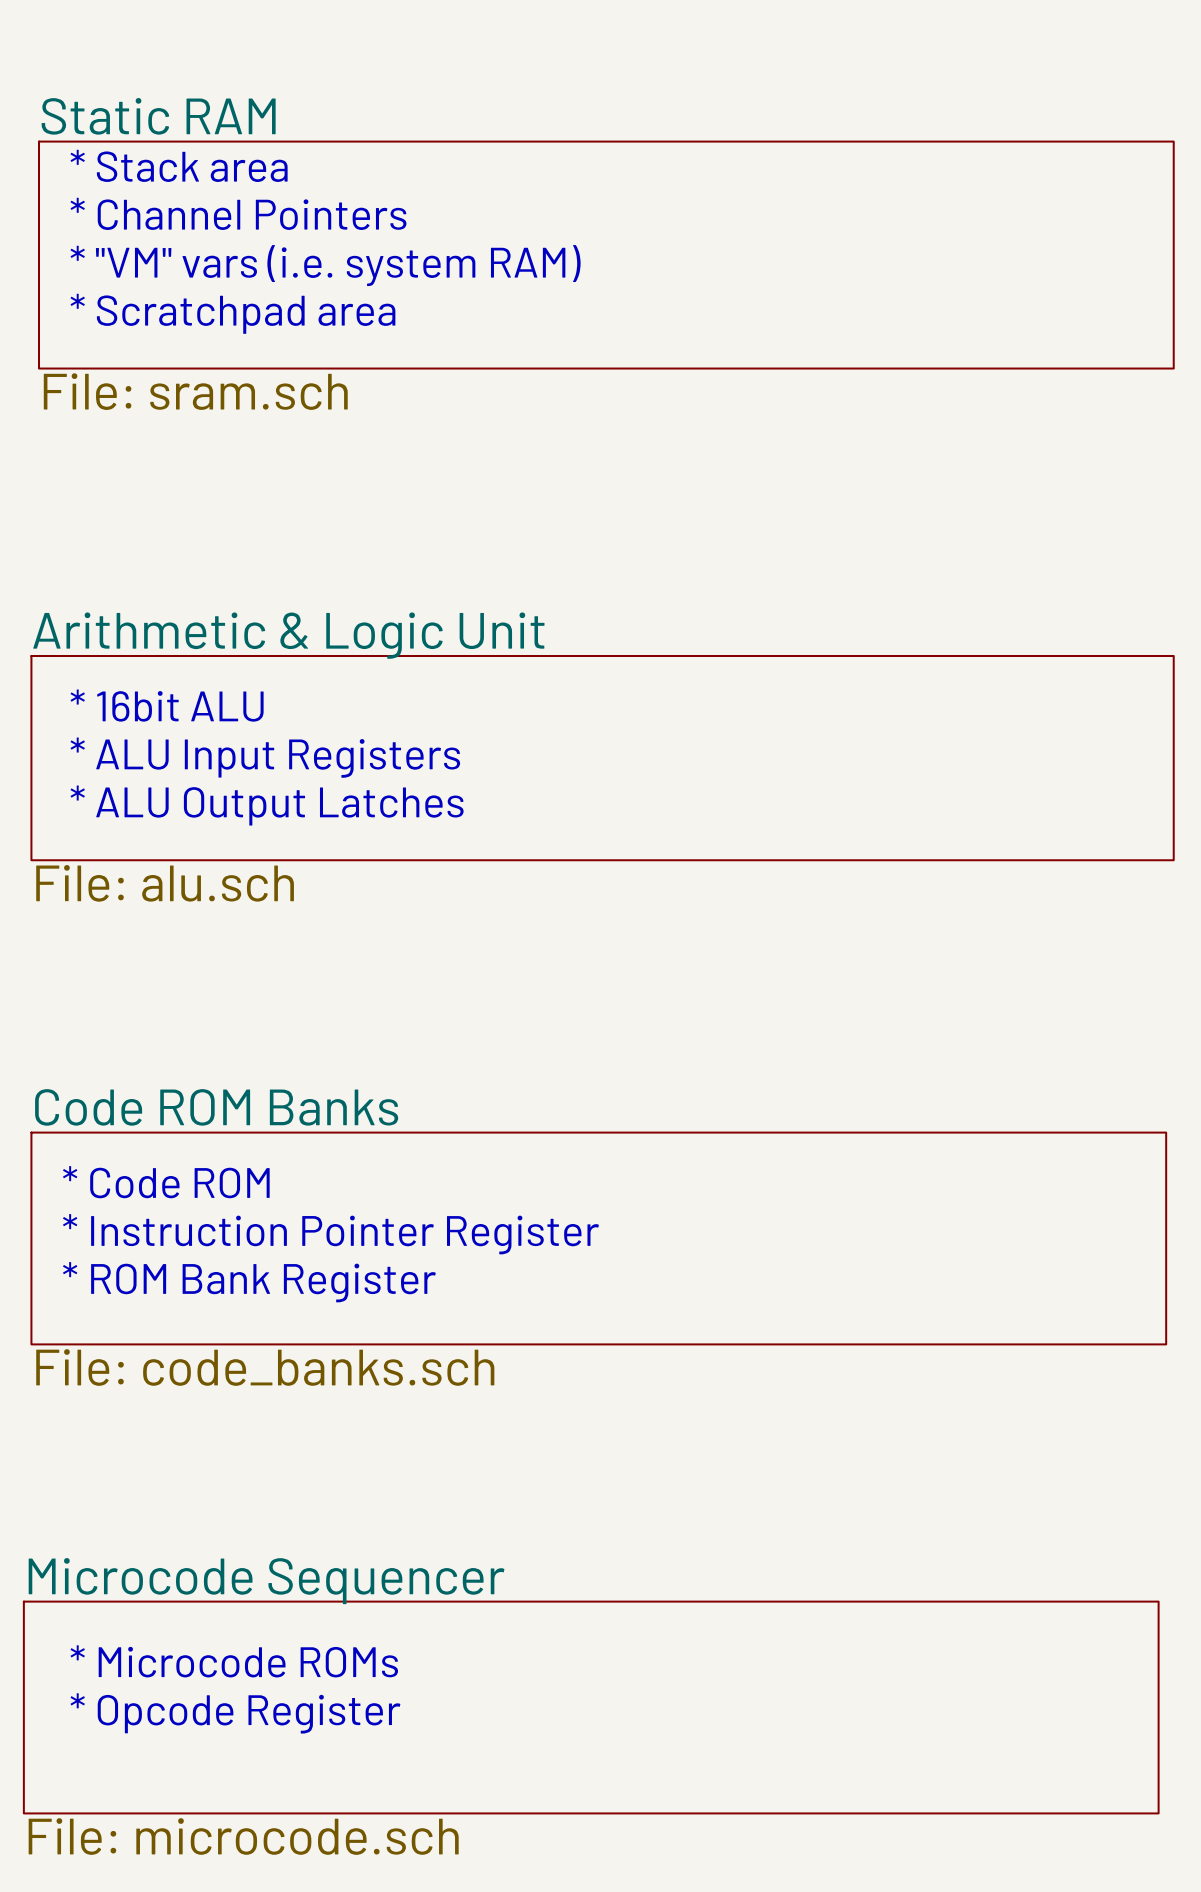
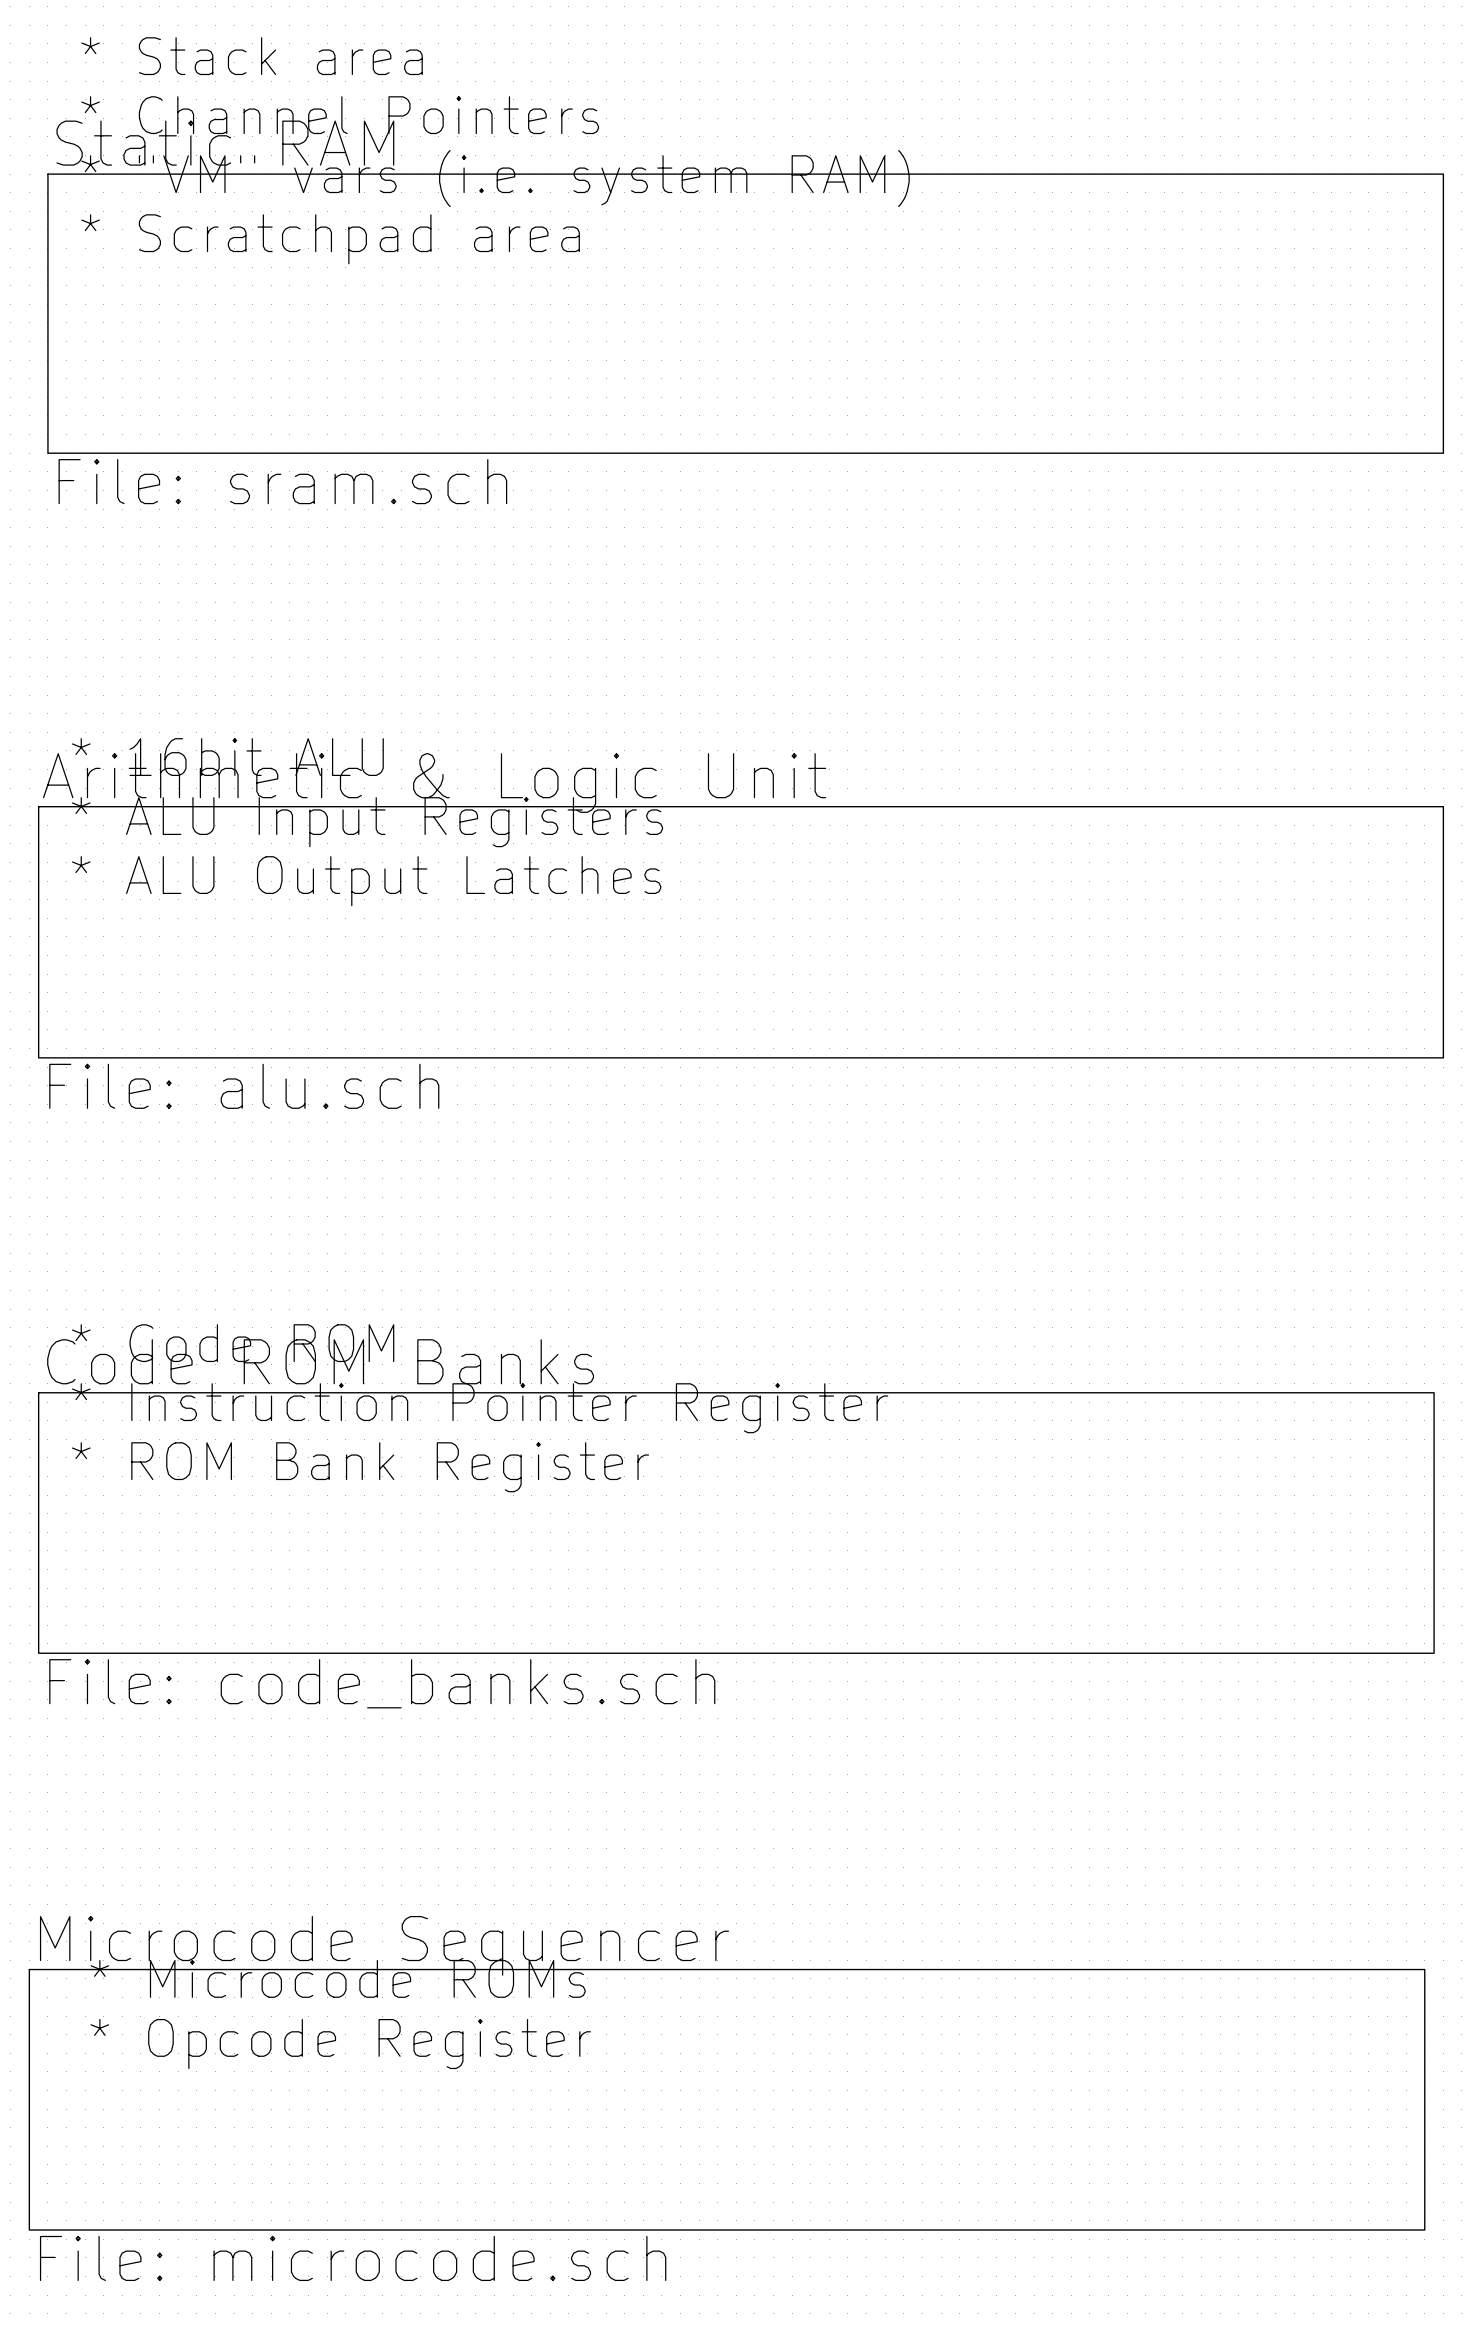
text position: * Stack area (179, 165) -> * Stack area (252, 56)
text position: * Channel Pointers (238, 213) -> * Channel Pointers (340, 115)
text position: * "VM" vars (i.e. system RAM) (325, 265) -> * "VM" vars (i.e. system RAM) (495, 178)
text position: * Scratchpad area (233, 313) -> * Scratchpad area (330, 239)
text position: * 16bit ALU (167, 705) -> * 16bit ALU (227, 757)
text position: * ALU Input Registers (265, 757) -> * ALU Input Registers (367, 822)
text position: * ALU Output Latches (267, 805) -> * ALU Output Latches (366, 881)
text position: * Code ROM (166, 1182) -> * Code ROM (233, 1343)
text position: * Instruction Pointer Register (330, 1234) -> * Instruction Pointer Register (480, 1408)
text position: * ROM Bank Register (249, 1282) -> * ROM Bank Register (360, 1467)
text position: * Microcode ROMs (234, 1661) -> * Microcode ROMs (338, 1978)
text position: * Opcode Register (235, 1713) -> * Opcode Register (340, 2044)

